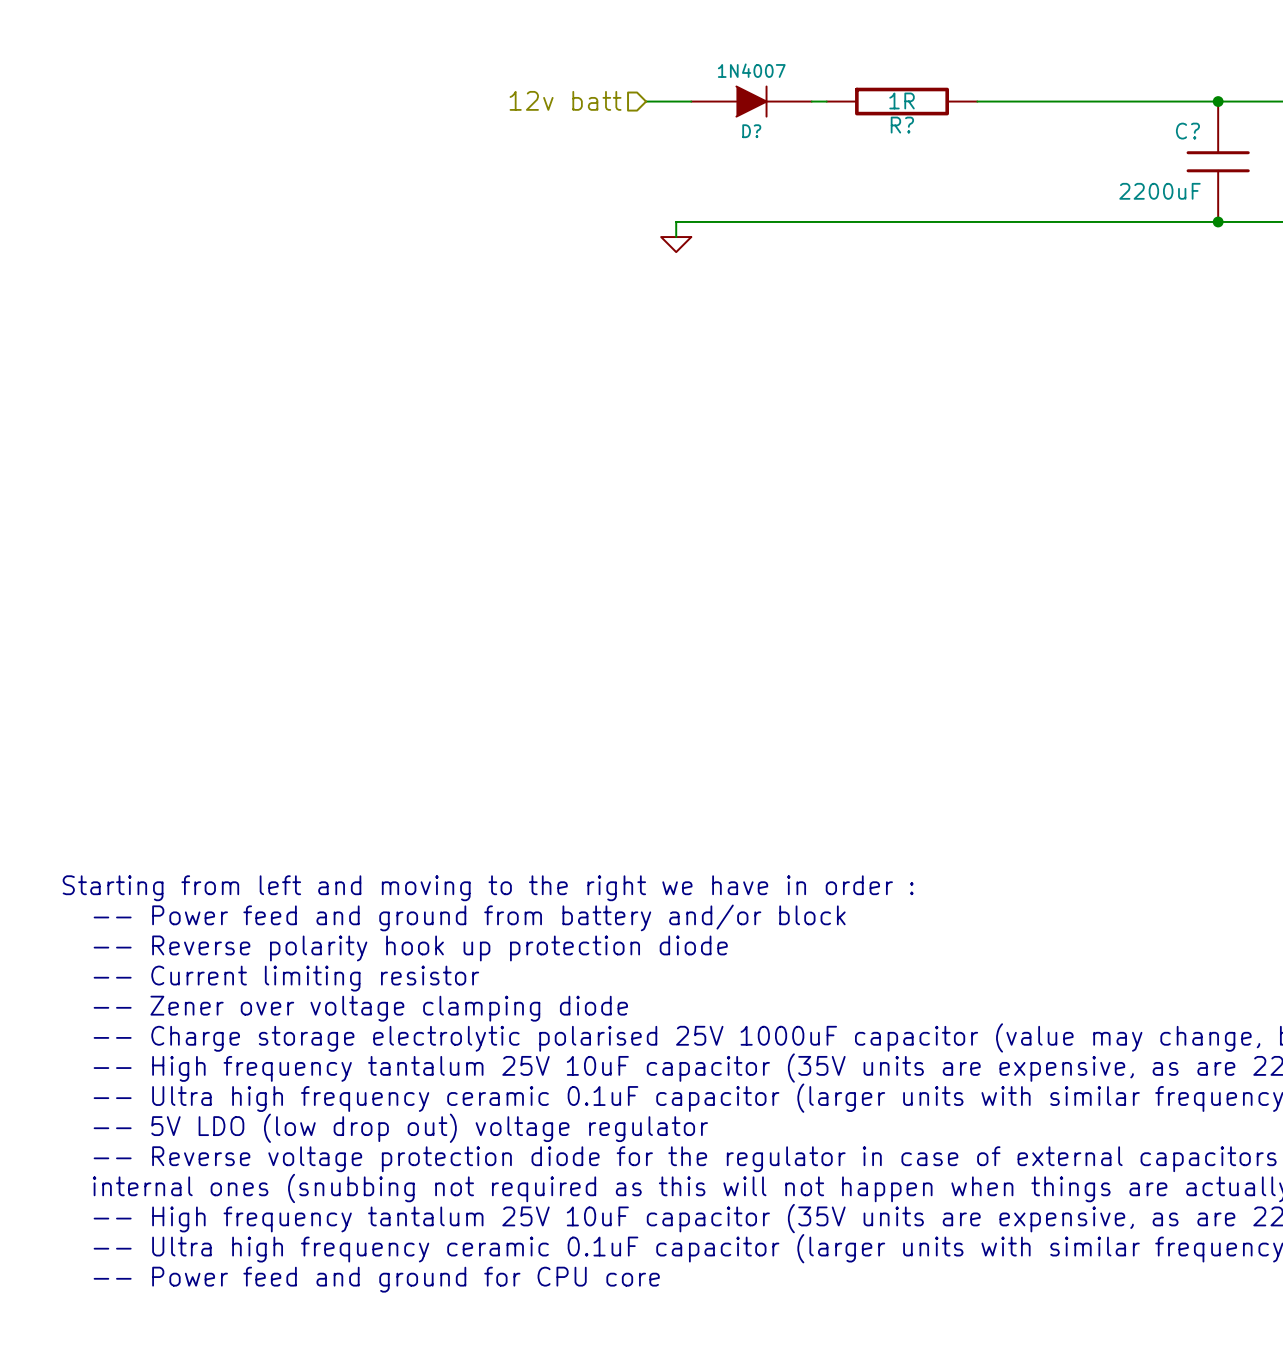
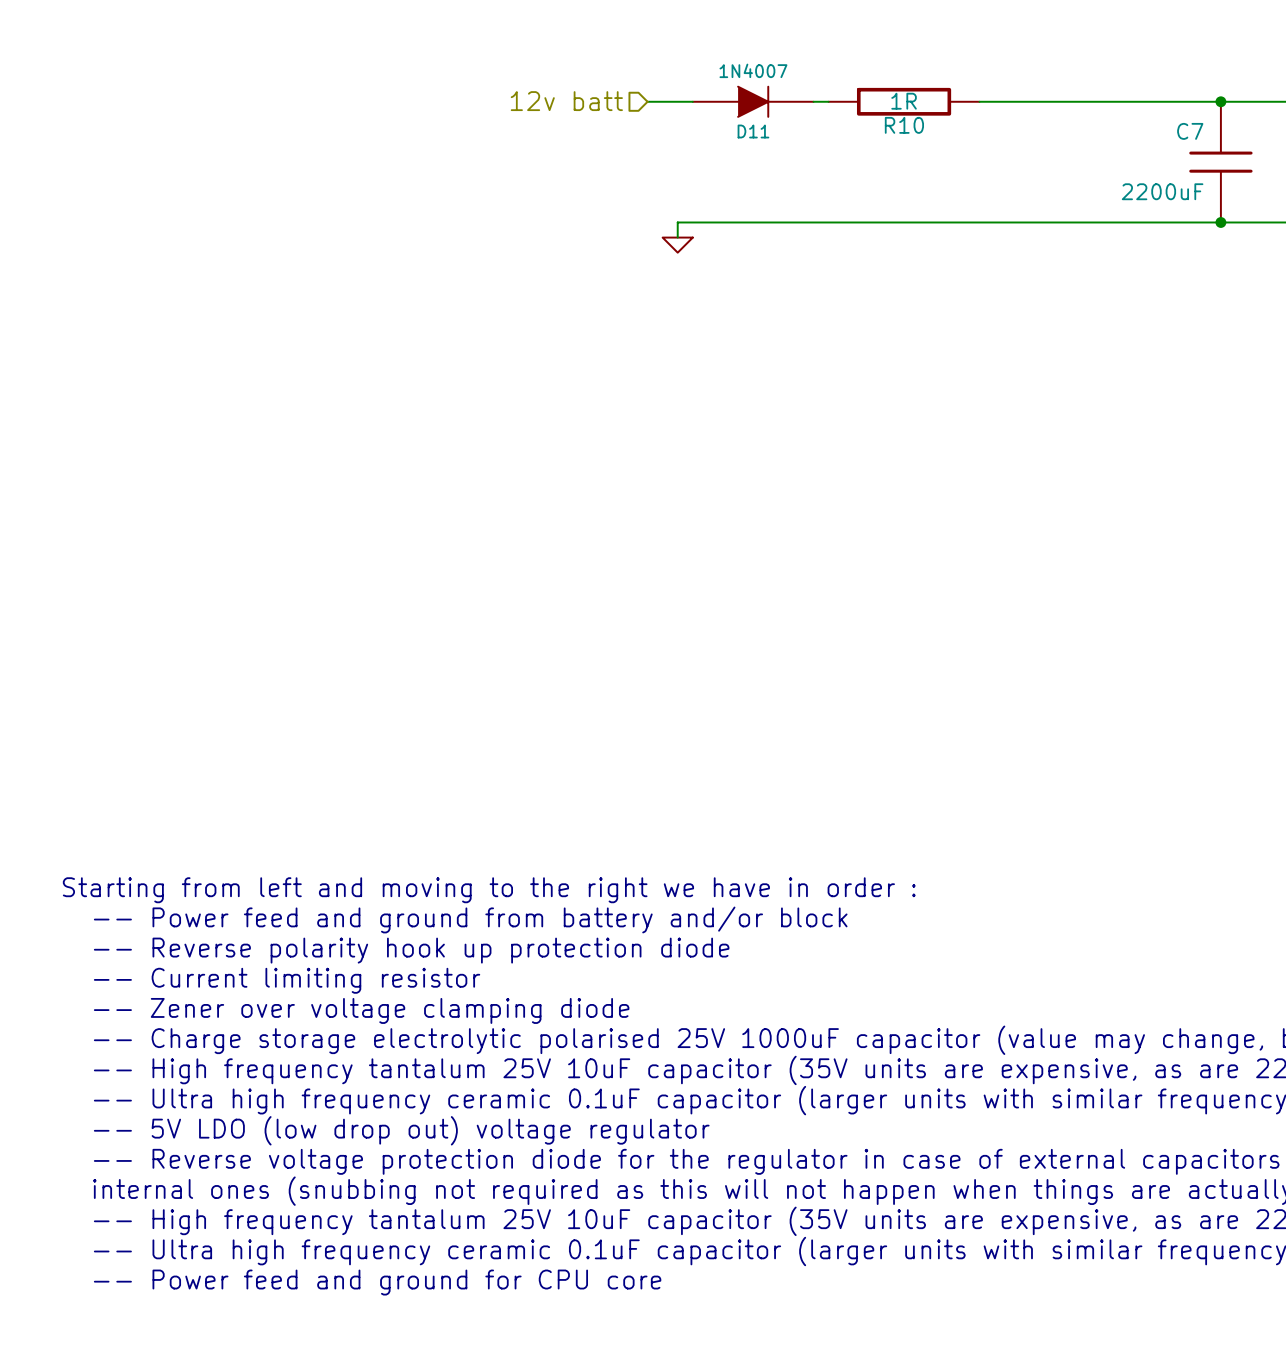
R? name: R? (902, 125) -> R10 (904, 125)
D? name: D? (751, 131) -> D11 (753, 131)
C? name: C? (1187, 131) -> C7 (1190, 131)

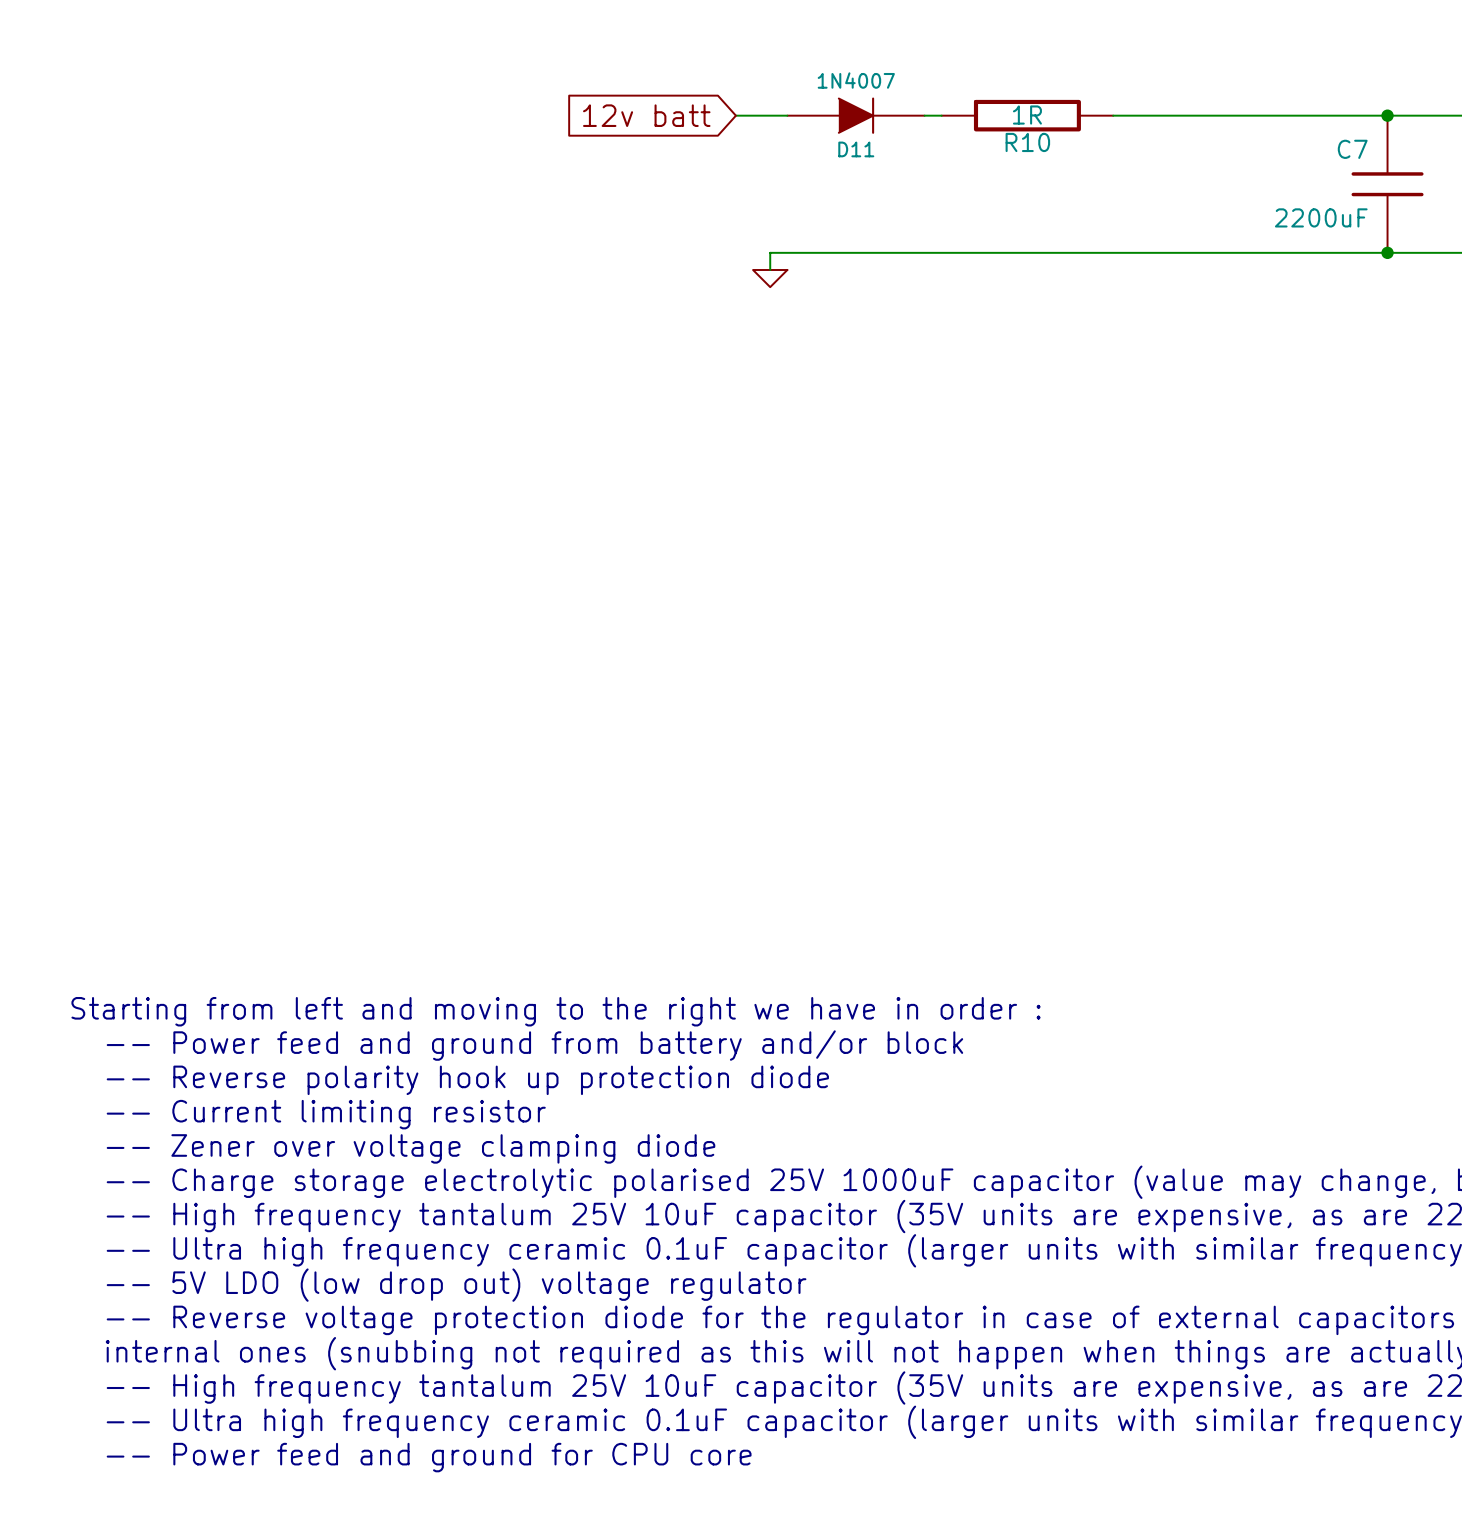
hierarchical label: 12v batt (566, 101) -> none
global label: none -> 12v batt (646, 115)

